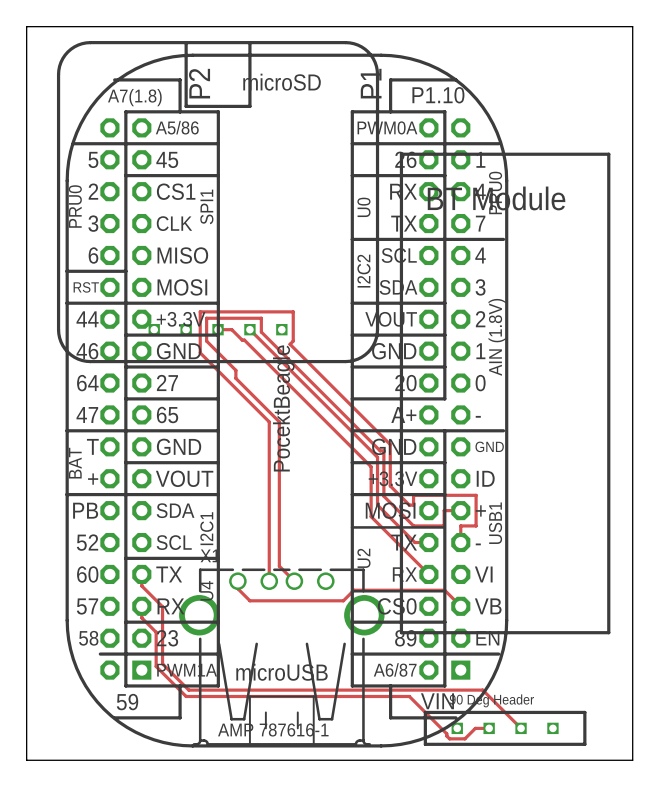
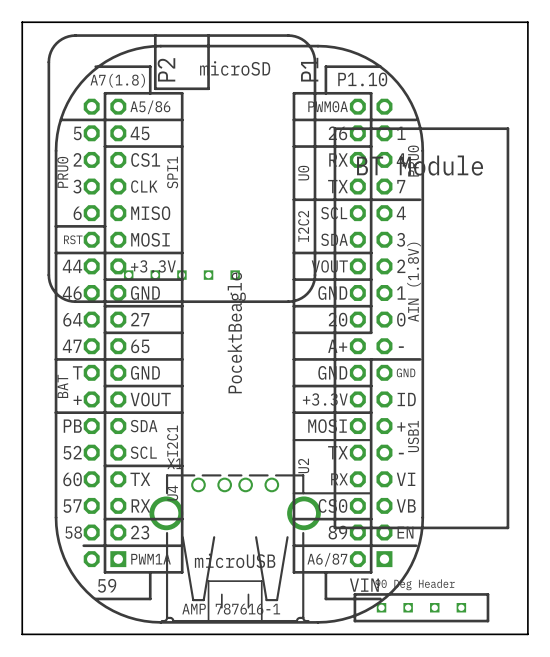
track: (218, 329) (231, 329) (244, 340) (371, 466) (371, 516) (428, 574) -> none
track: (249, 329) (377, 457) (377, 505) (414, 542) (428, 542) -> none
track: (460, 510) (444, 510) (444, 525) (413, 525) (383, 496) (383, 450) (380, 450) (261, 332) (261, 318) (206, 318) (206, 341) (235, 370) (235, 378) (279, 421) (279, 566) (294, 581) -> none
track: (460, 542) (460, 525) (476, 525) (476, 495) (413, 495) (413, 505) (409, 505) (390, 485) (390, 444) (290, 344) (293, 341) (293, 311) (200, 311) (200, 352) (269, 421) (269, 581) -> none
track: (141, 574) (141, 586) (162, 606) (162, 663) (188, 690) (482, 690) (521, 728) -> none
track: (237, 581) (237, 588) (249, 600) (343, 600) (353, 590) (444, 590) (460, 606) -> none
track: (141, 606) (141, 617) (156, 632) (156, 666) (186, 696) (409, 696) (449, 738) (464, 738) (475, 728) (489, 728) -> none

